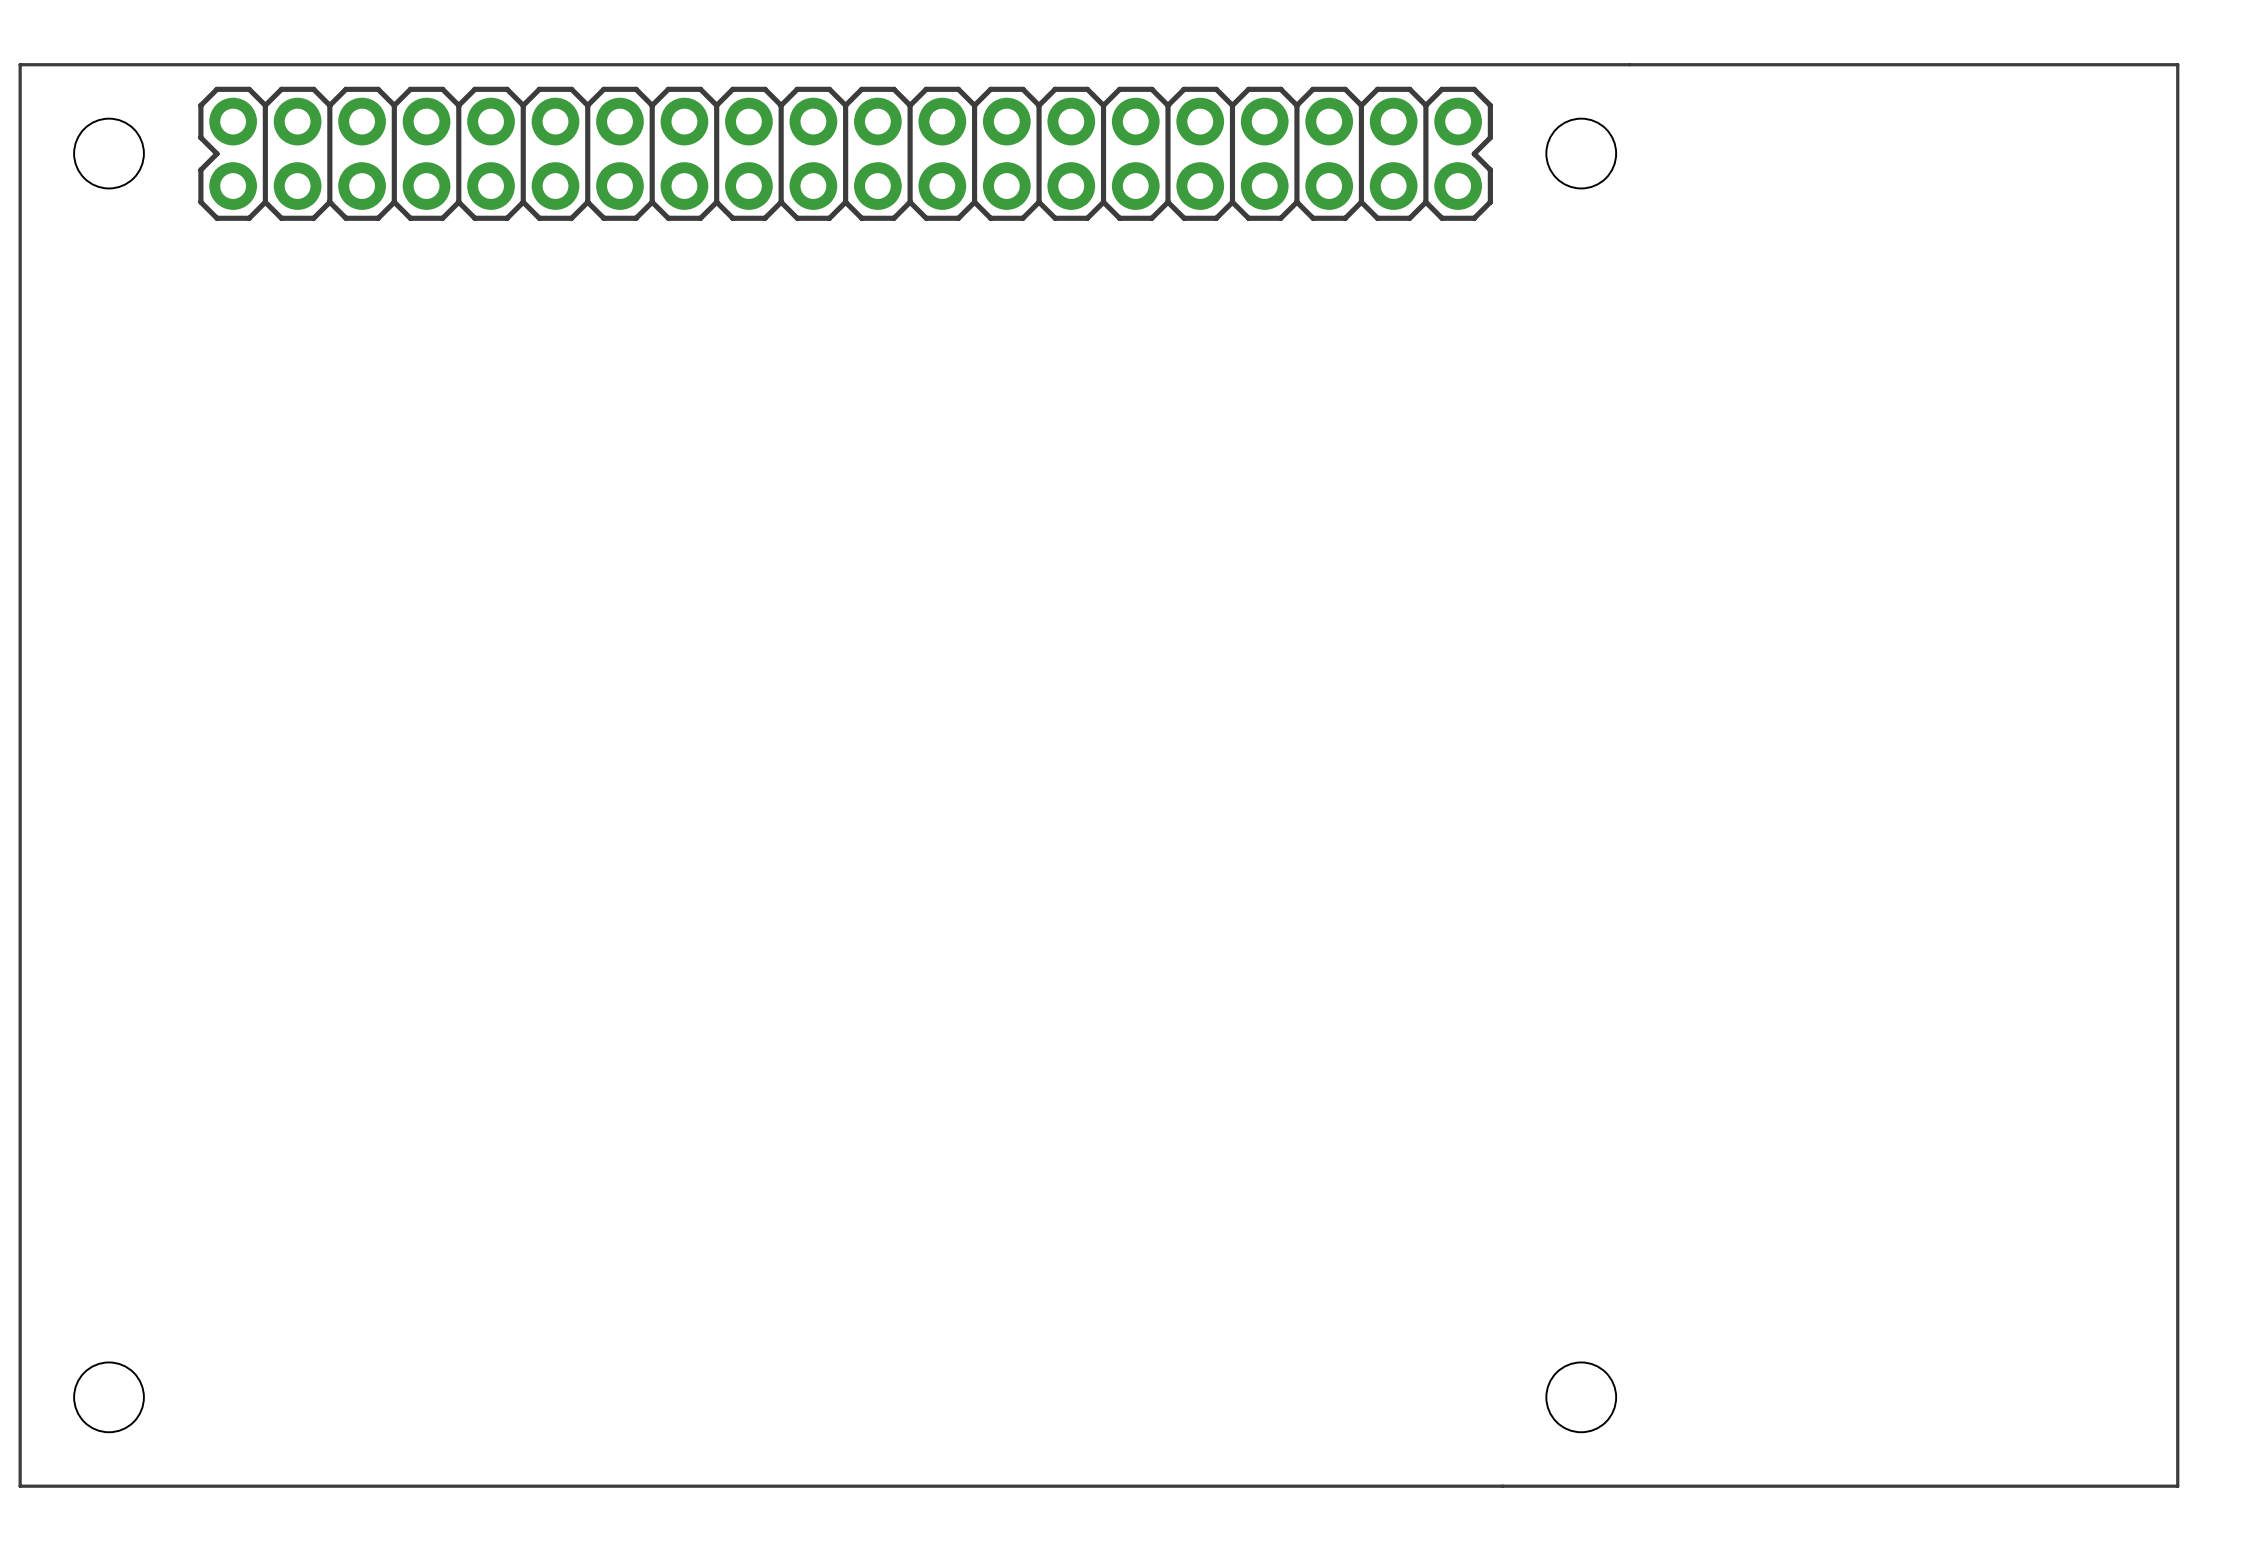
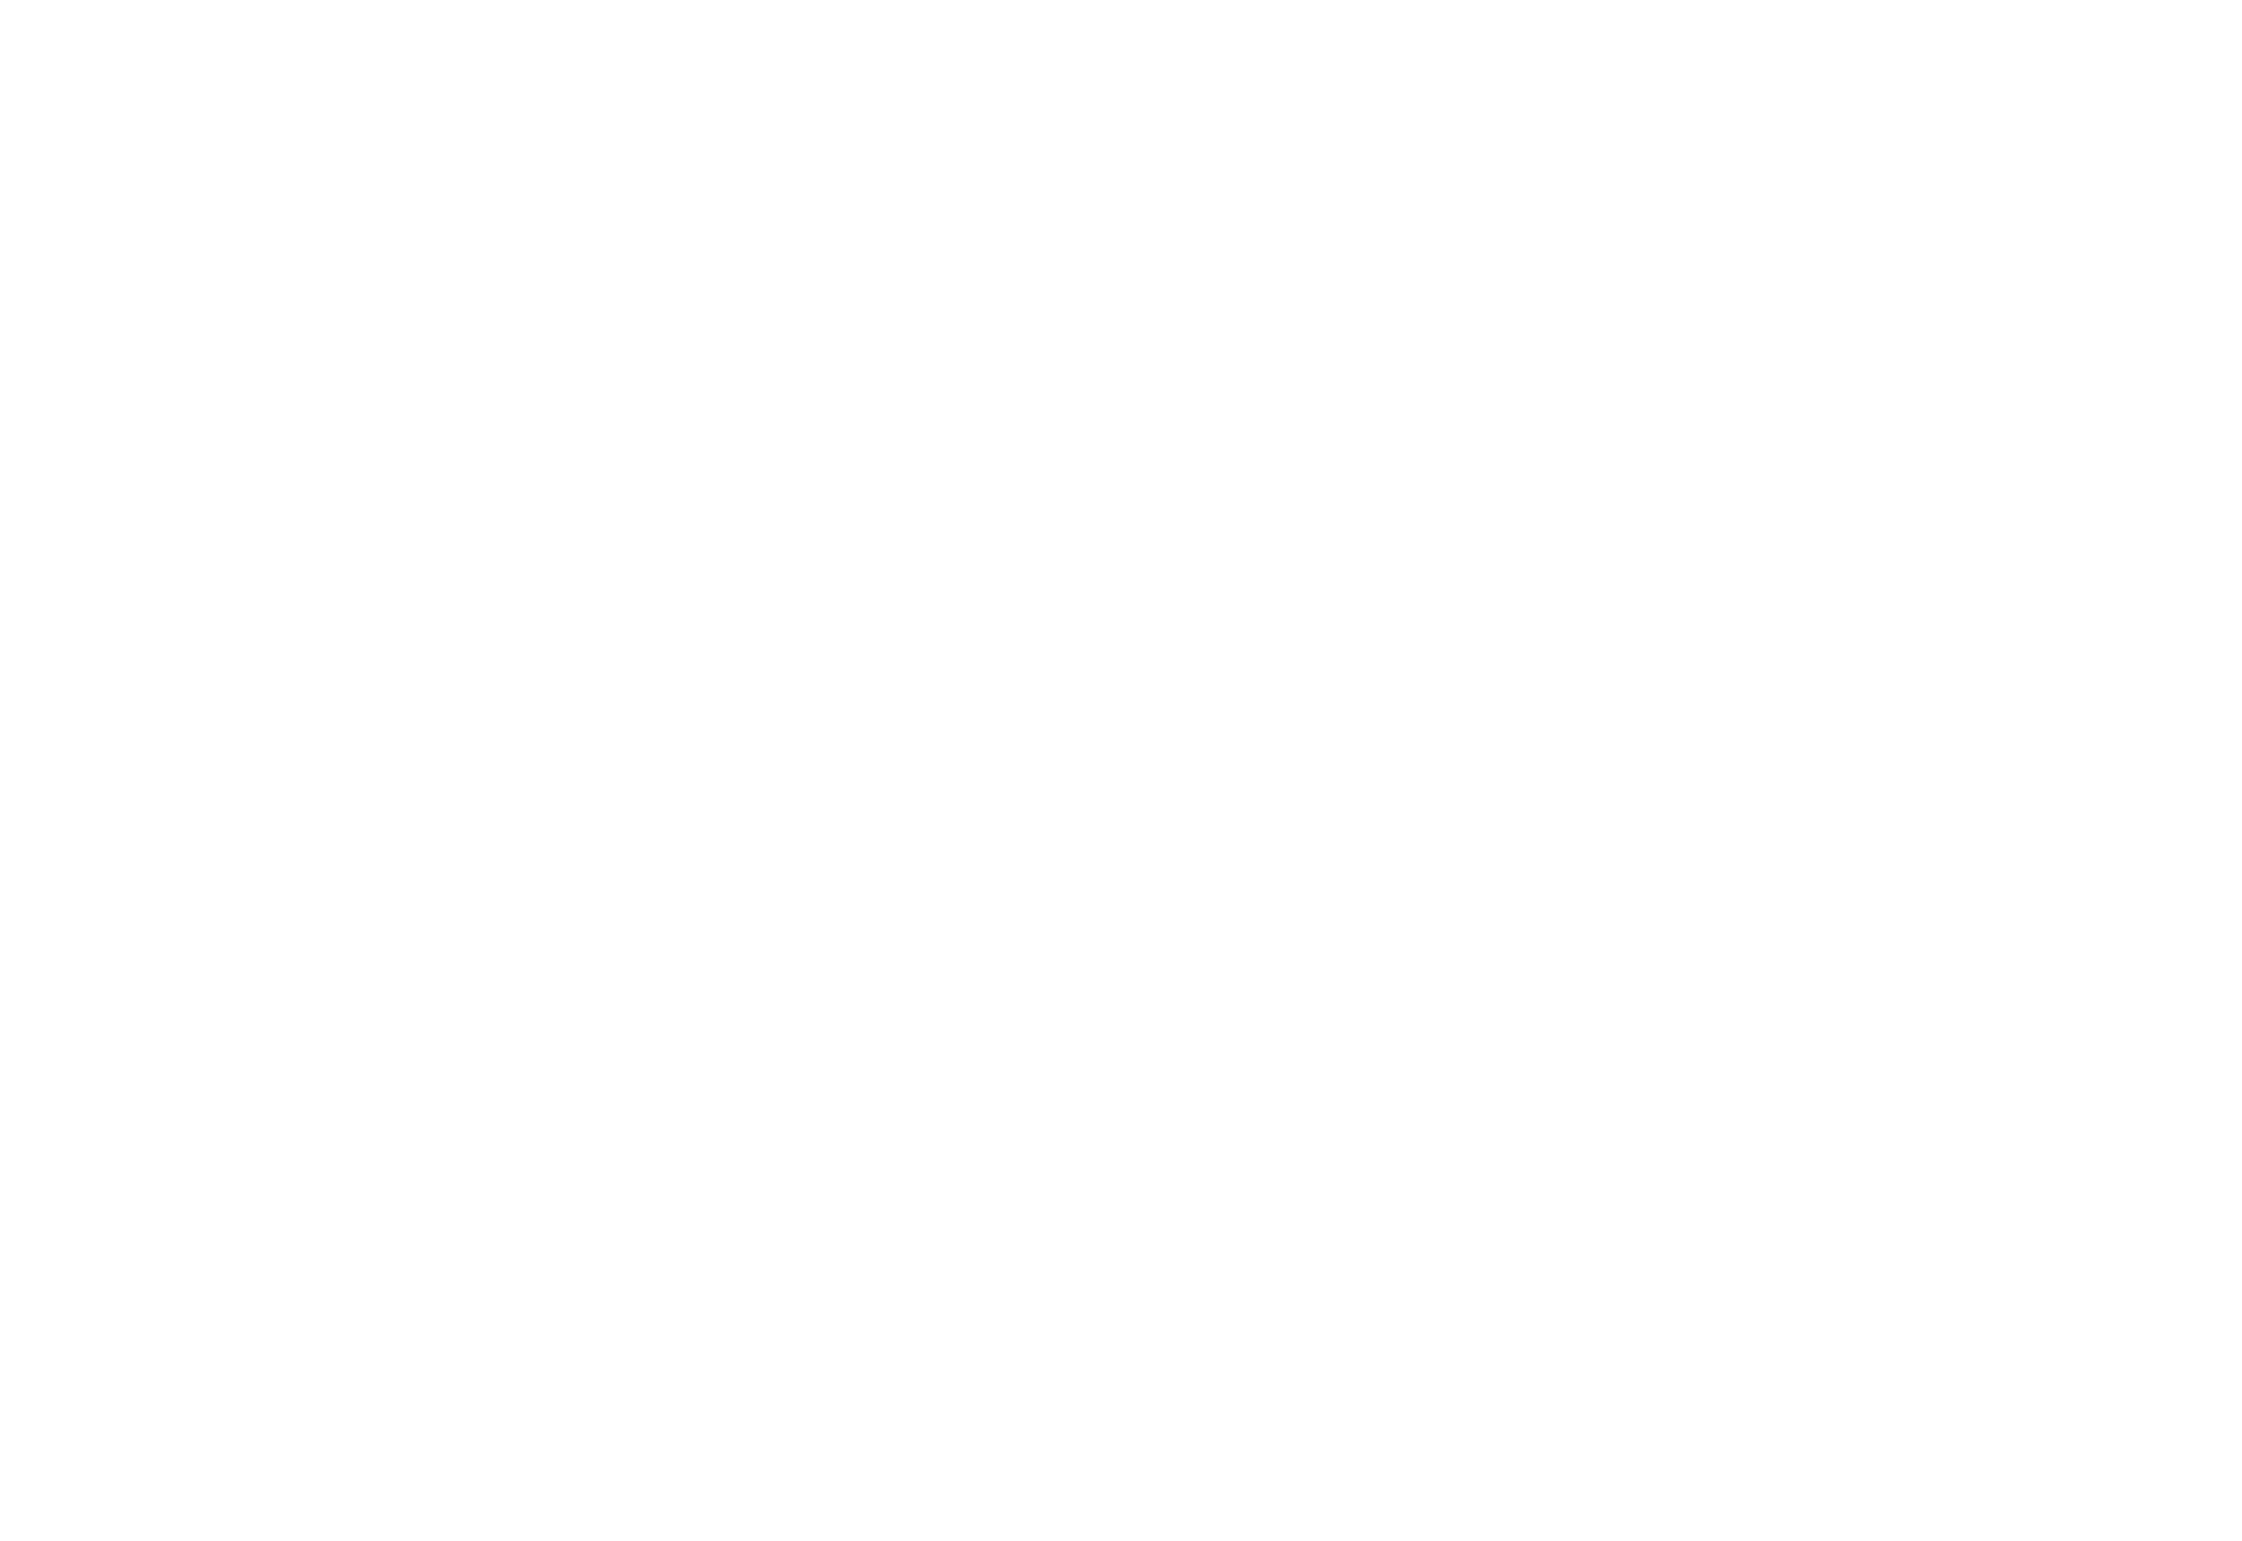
part: (1098, 775) -> none

